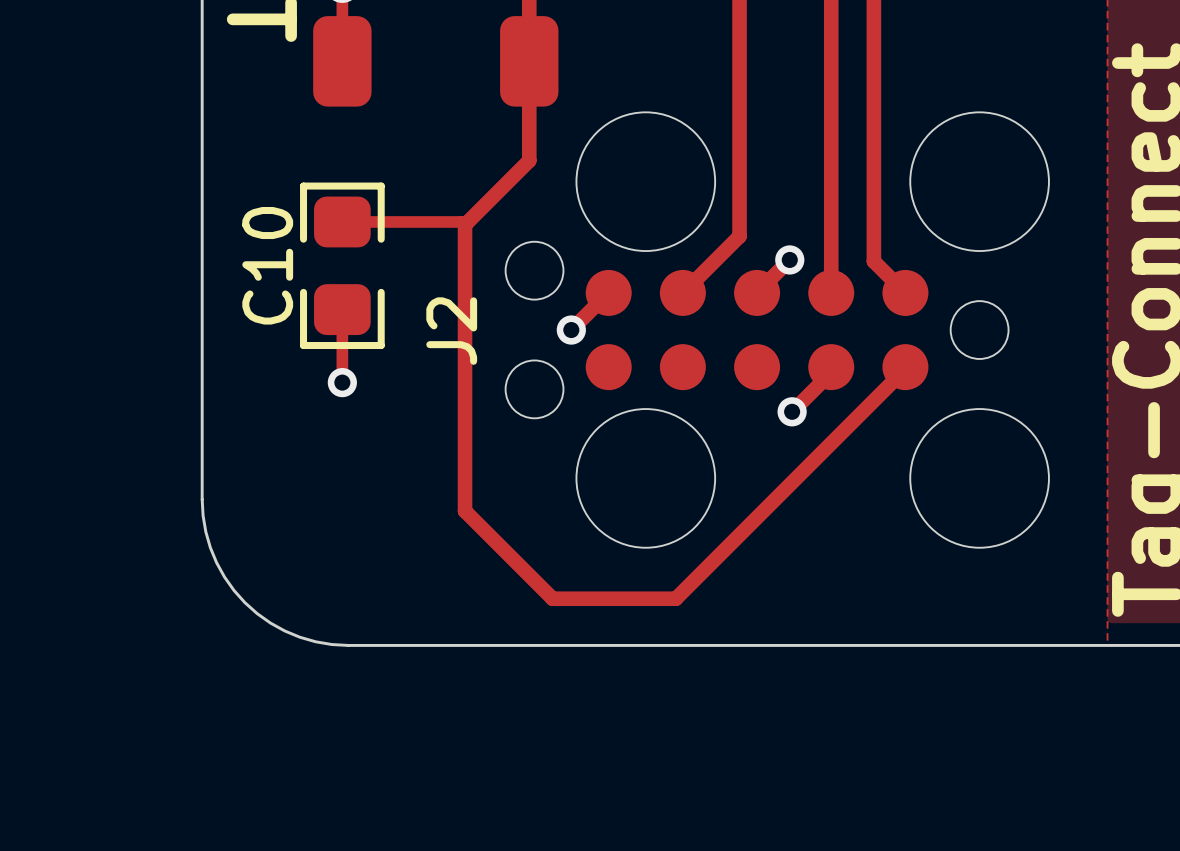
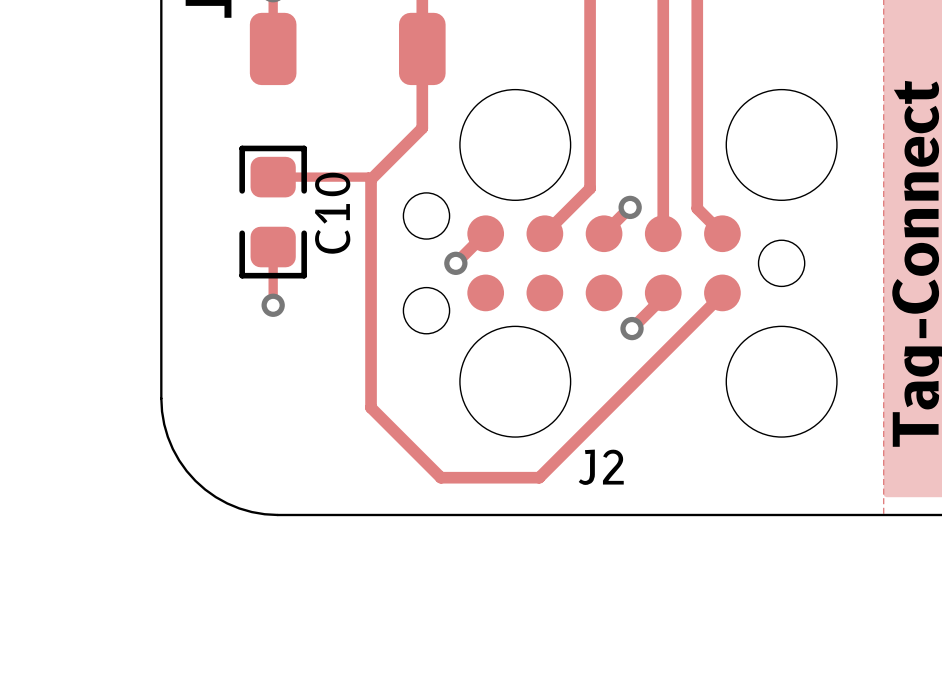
C10 name position: C10 (267, 265) -> C10 (332, 213)
J2 name rotation: 0° (451, 331) -> 90° clockwise (601, 467)
J2 name position: J2 (451, 331) -> J2 (601, 467)

